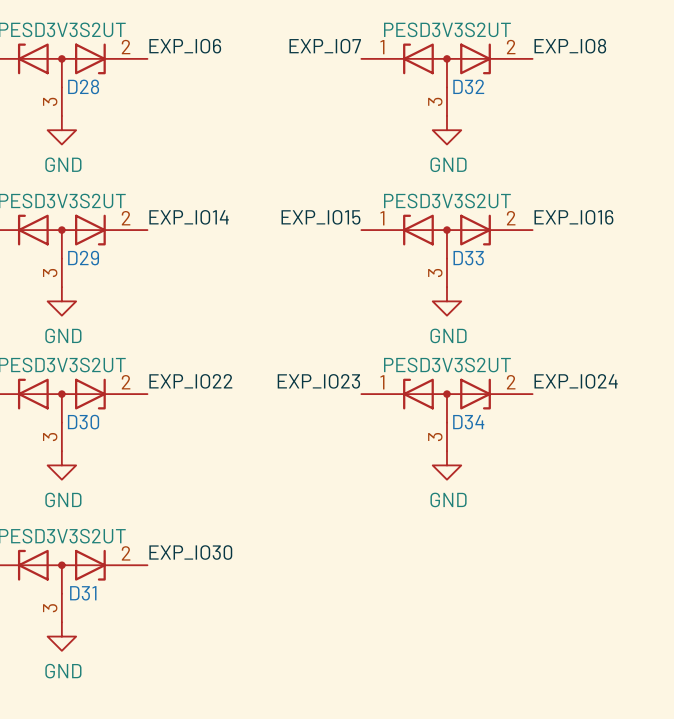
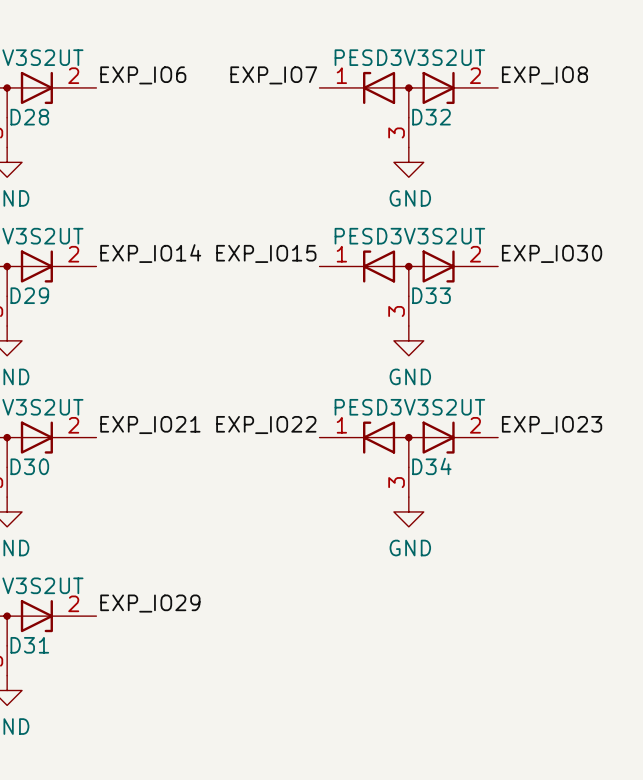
label: EXP_IO16 (573, 217) -> EXP_IO30 (552, 253)
label: EXP_IO22 (190, 381) -> EXP_IO21 (150, 425)
label: EXP_IO23 (318, 381) -> EXP_IO22 (266, 425)
label: EXP_IO24 (576, 381) -> EXP_IO23 (552, 425)
label: EXP_IO30 (190, 552) -> EXP_IO29 (150, 603)

